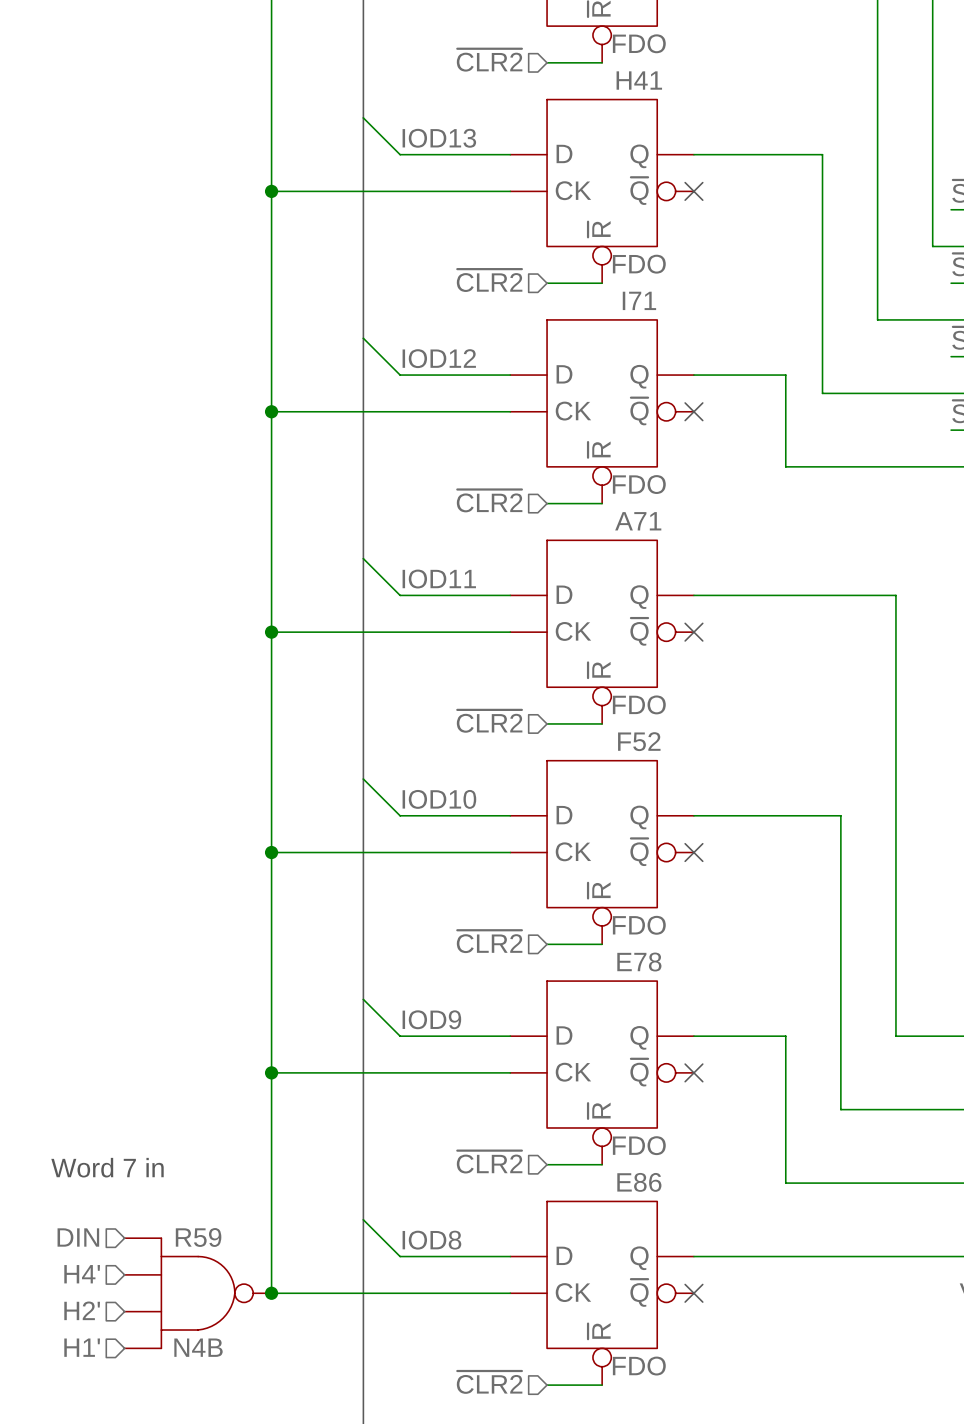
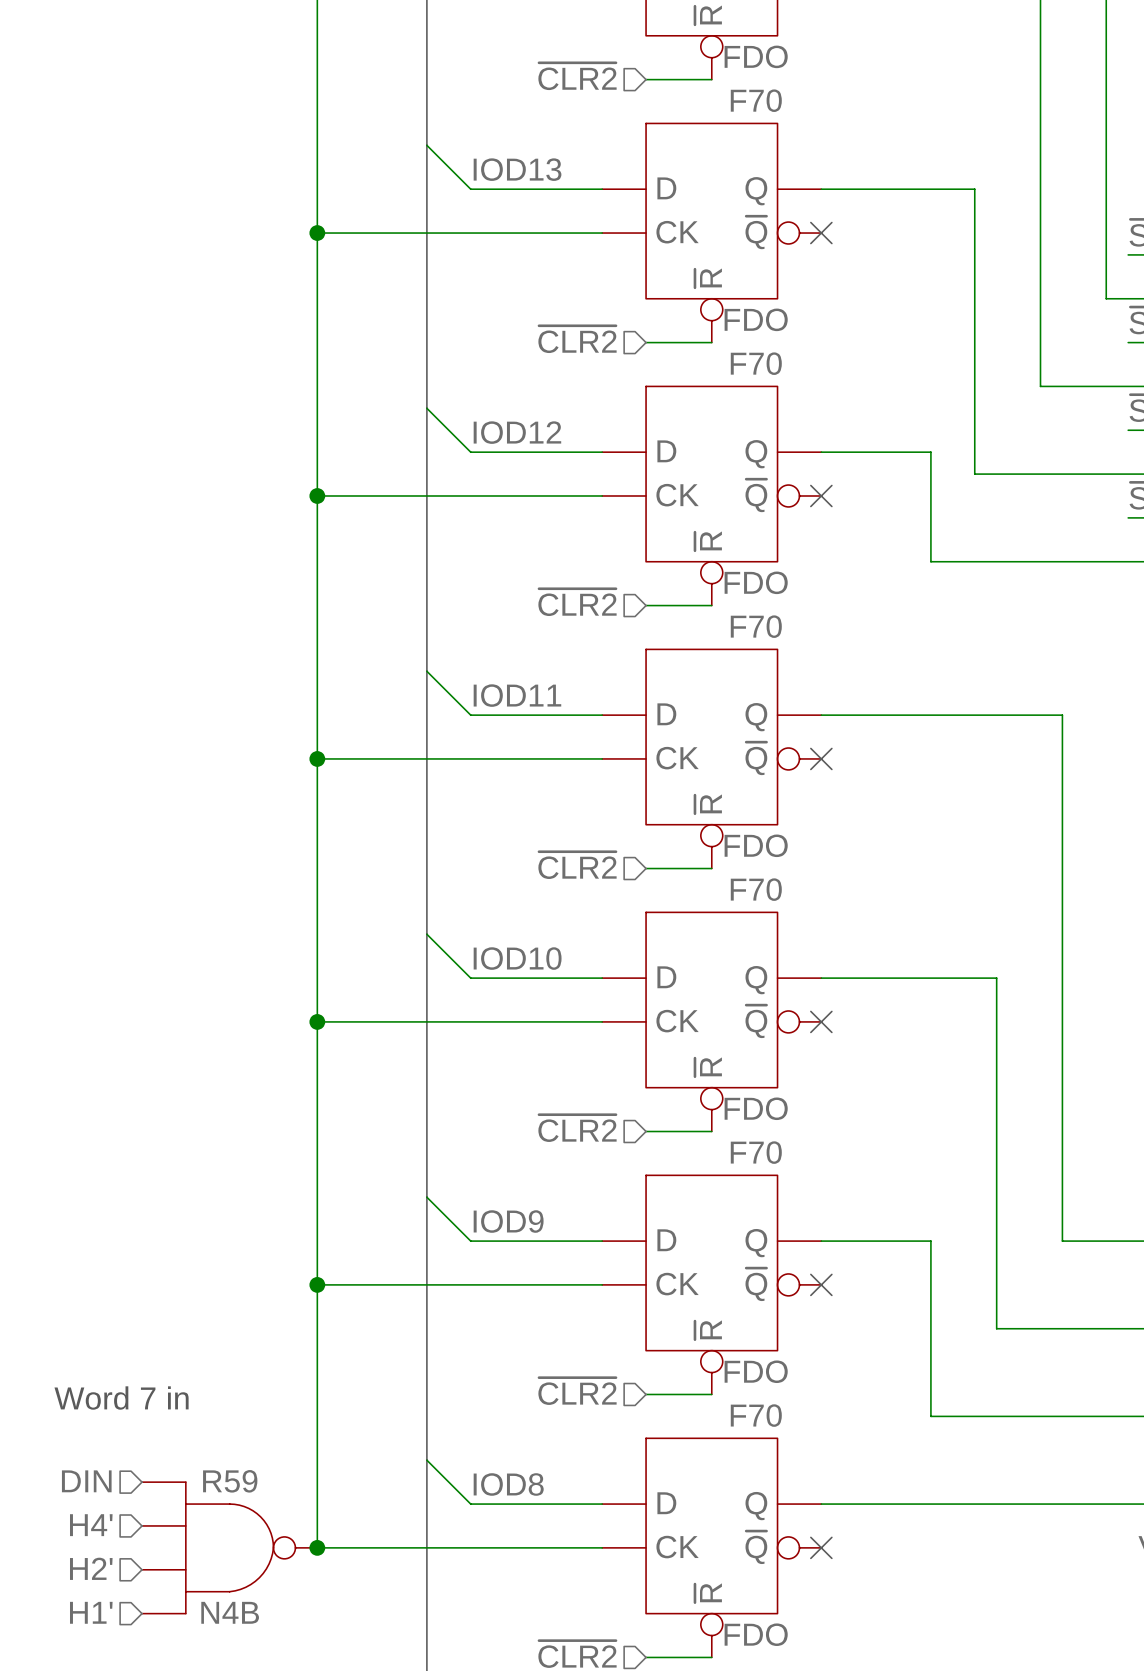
H41 name: H41 (639, 80) -> F70 (756, 100)
I71 name: I71 (639, 300) -> F70 (756, 363)
A71 name: A71 (638, 521) -> F70 (756, 626)
F52 name: F52 (639, 741) -> F70 (756, 889)
E78 name: E78 (639, 962) -> F70 (756, 1152)
E86 name: E86 (639, 1182) -> F70 (756, 1415)

